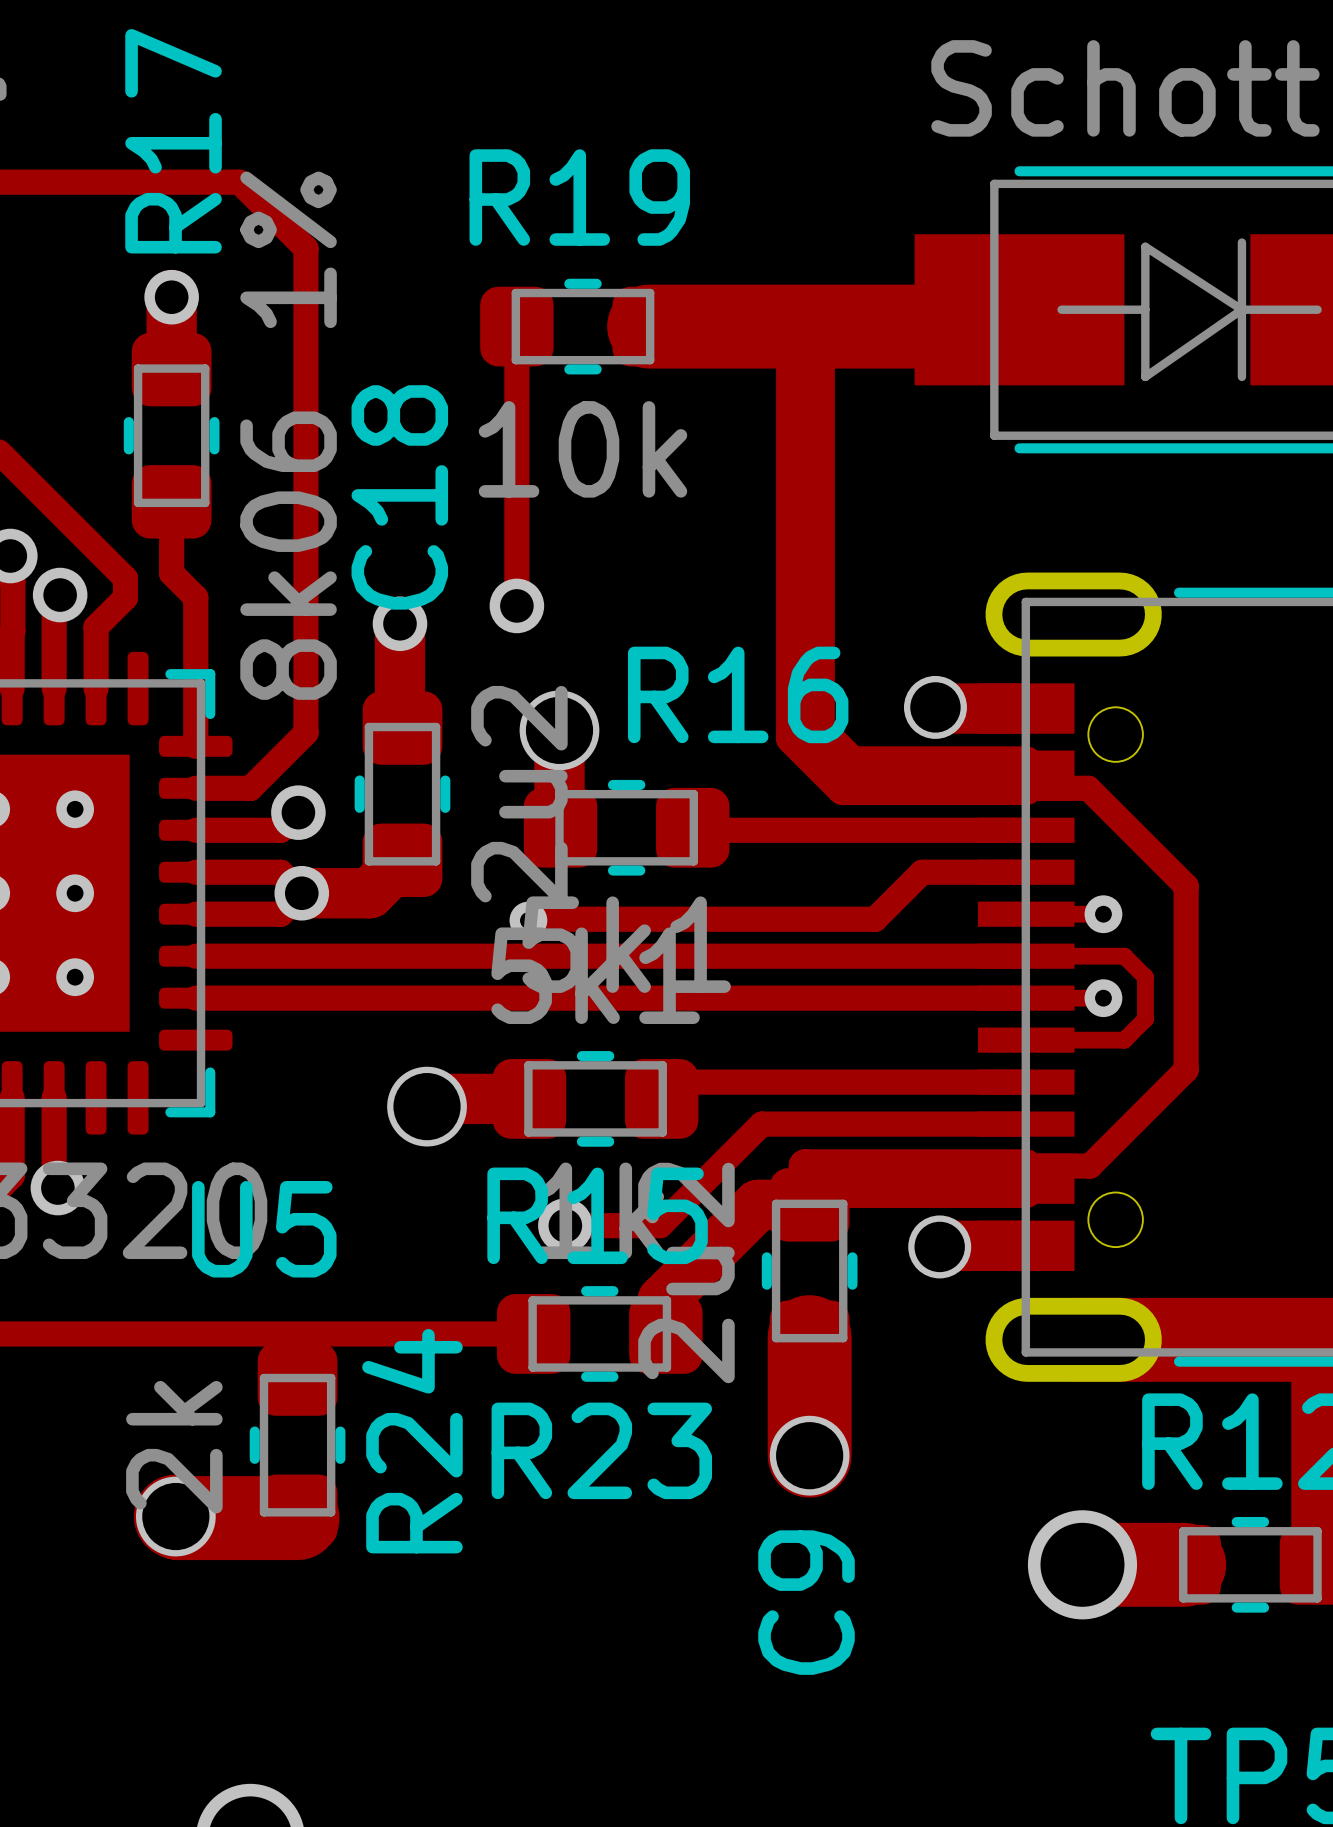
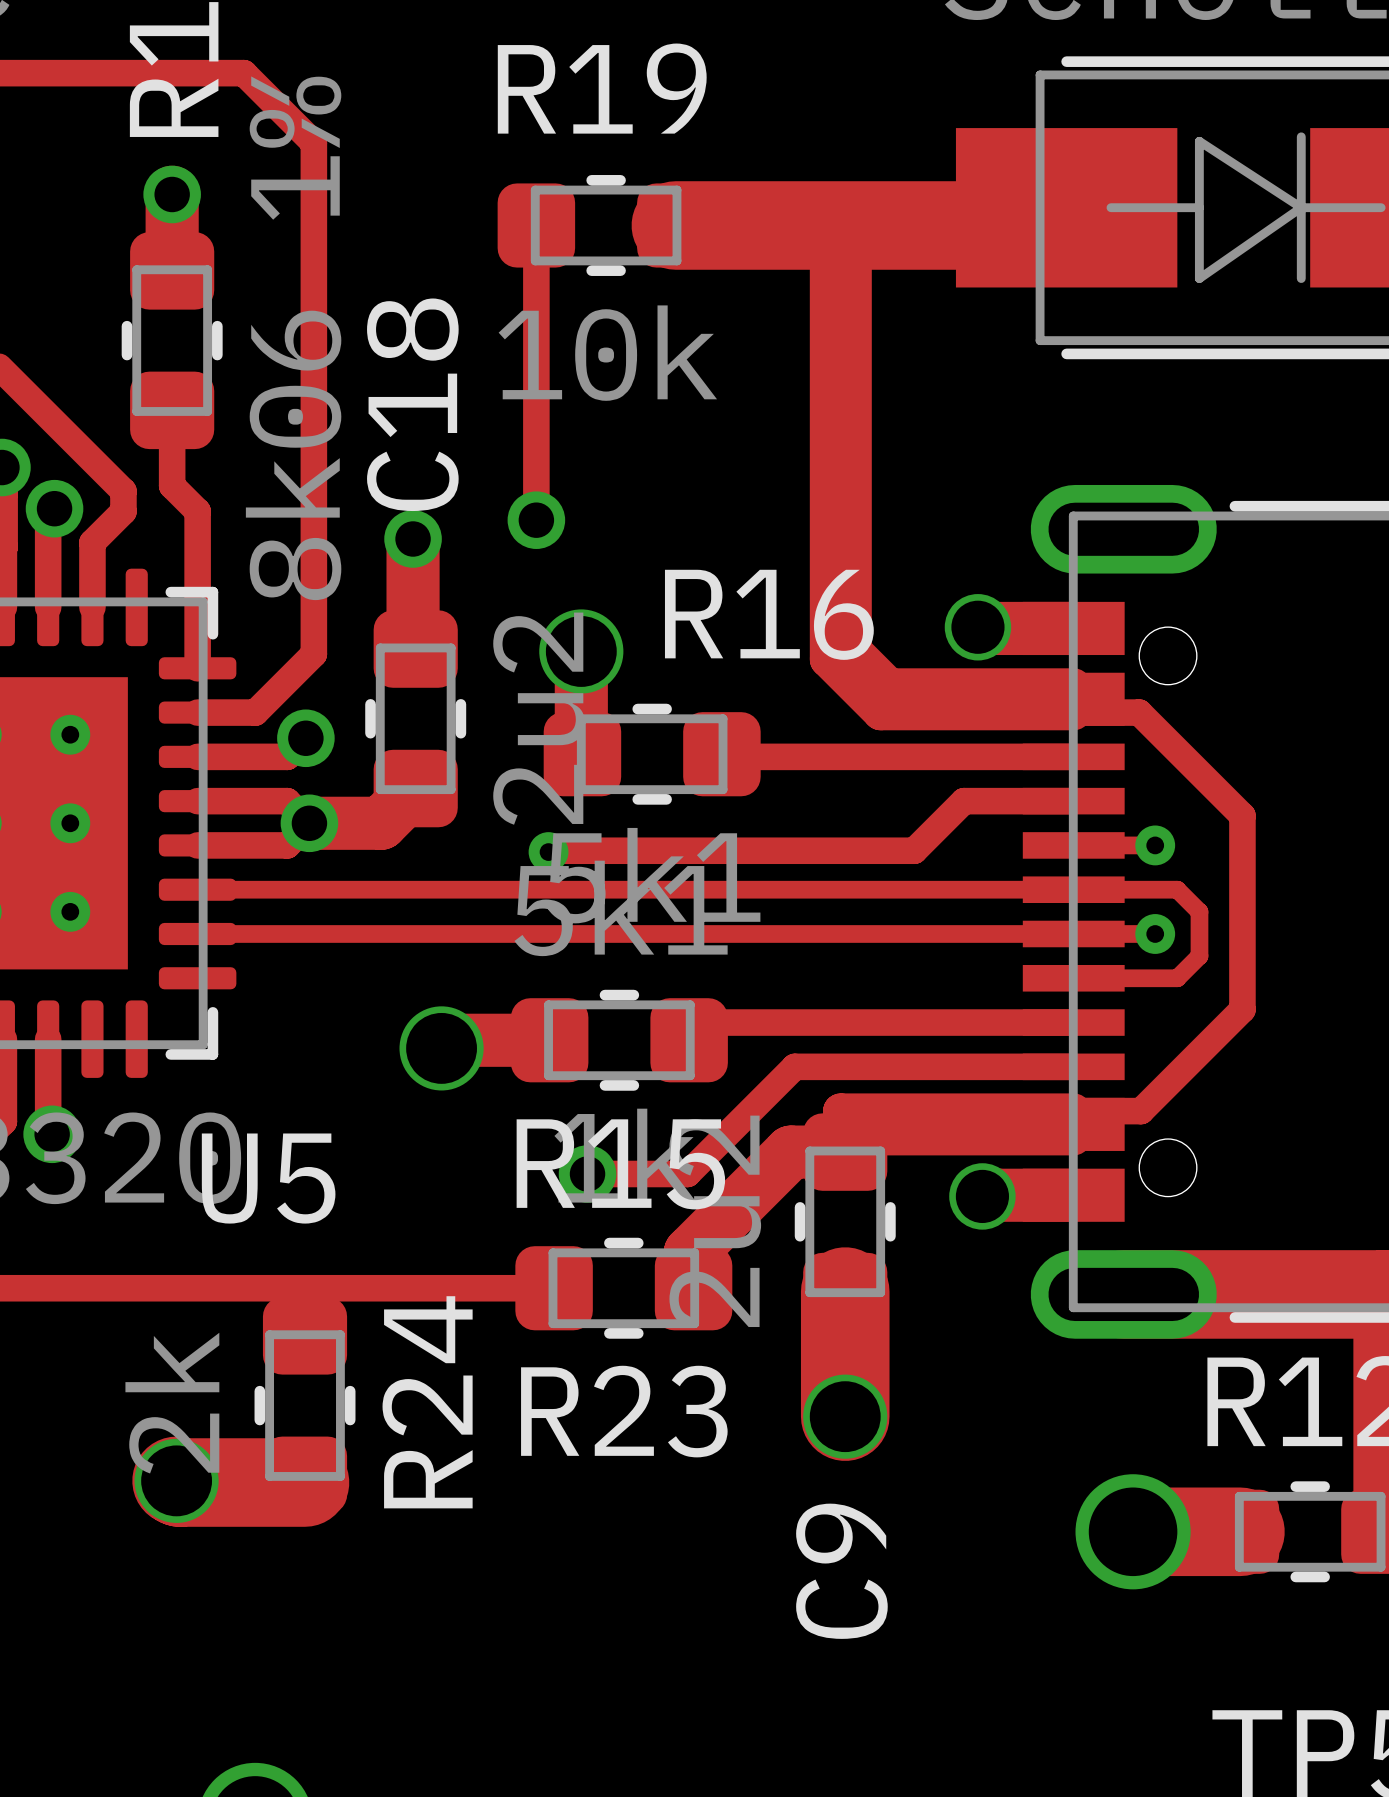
track width: thick (195, 956) (1026, 956) -> thin (197, 889) (1073, 889)
track width: thick (195, 998) (1026, 998) -> thin (197, 933) (1073, 933)

